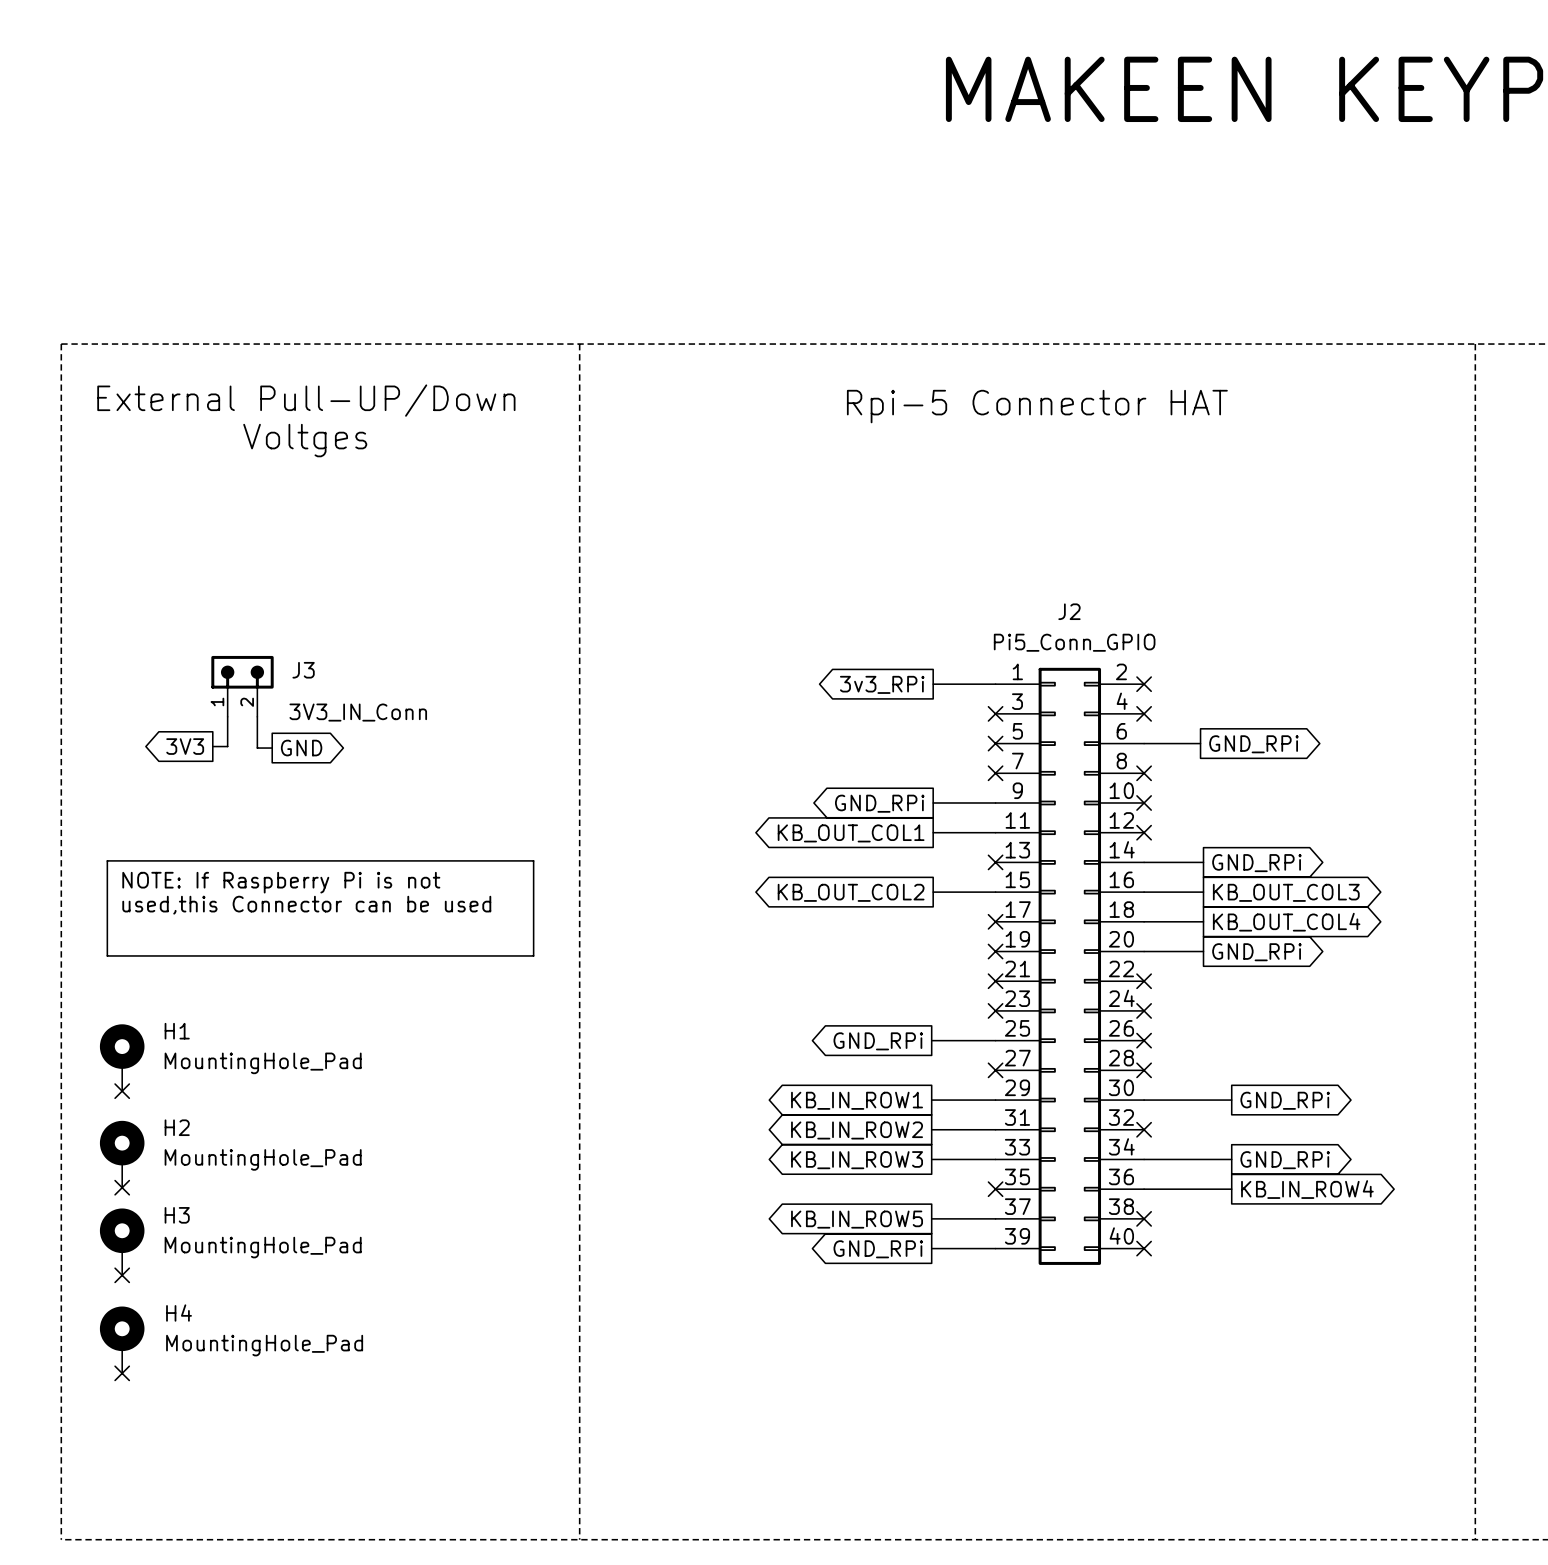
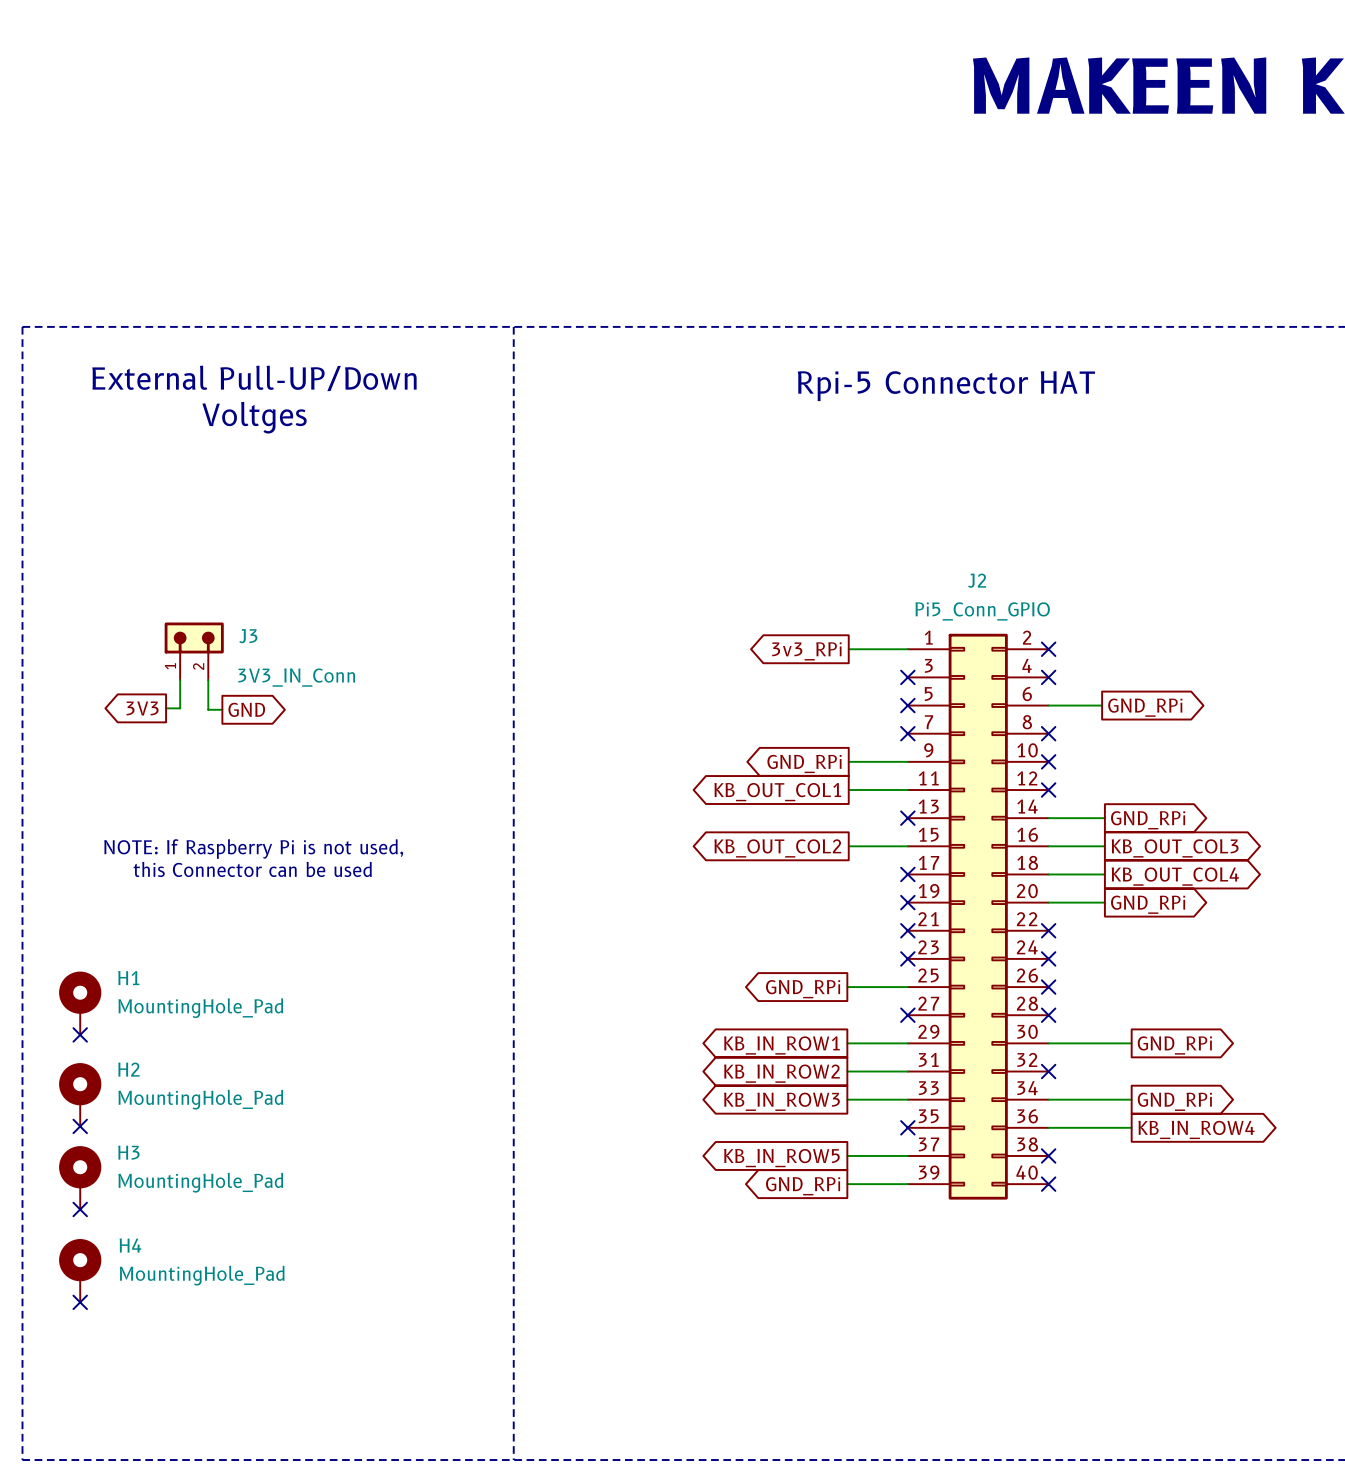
line: (107, 860) (533, 860) (533, 955) (107, 955) (107, 860) -> none
text: NOTE: If Raspberry Pi is not (281, 882) -> NOTE: If Raspberry Pi is not used, (253, 849)
text: used,this Connector can be used (306, 905) -> this Connector can be used (252, 869)

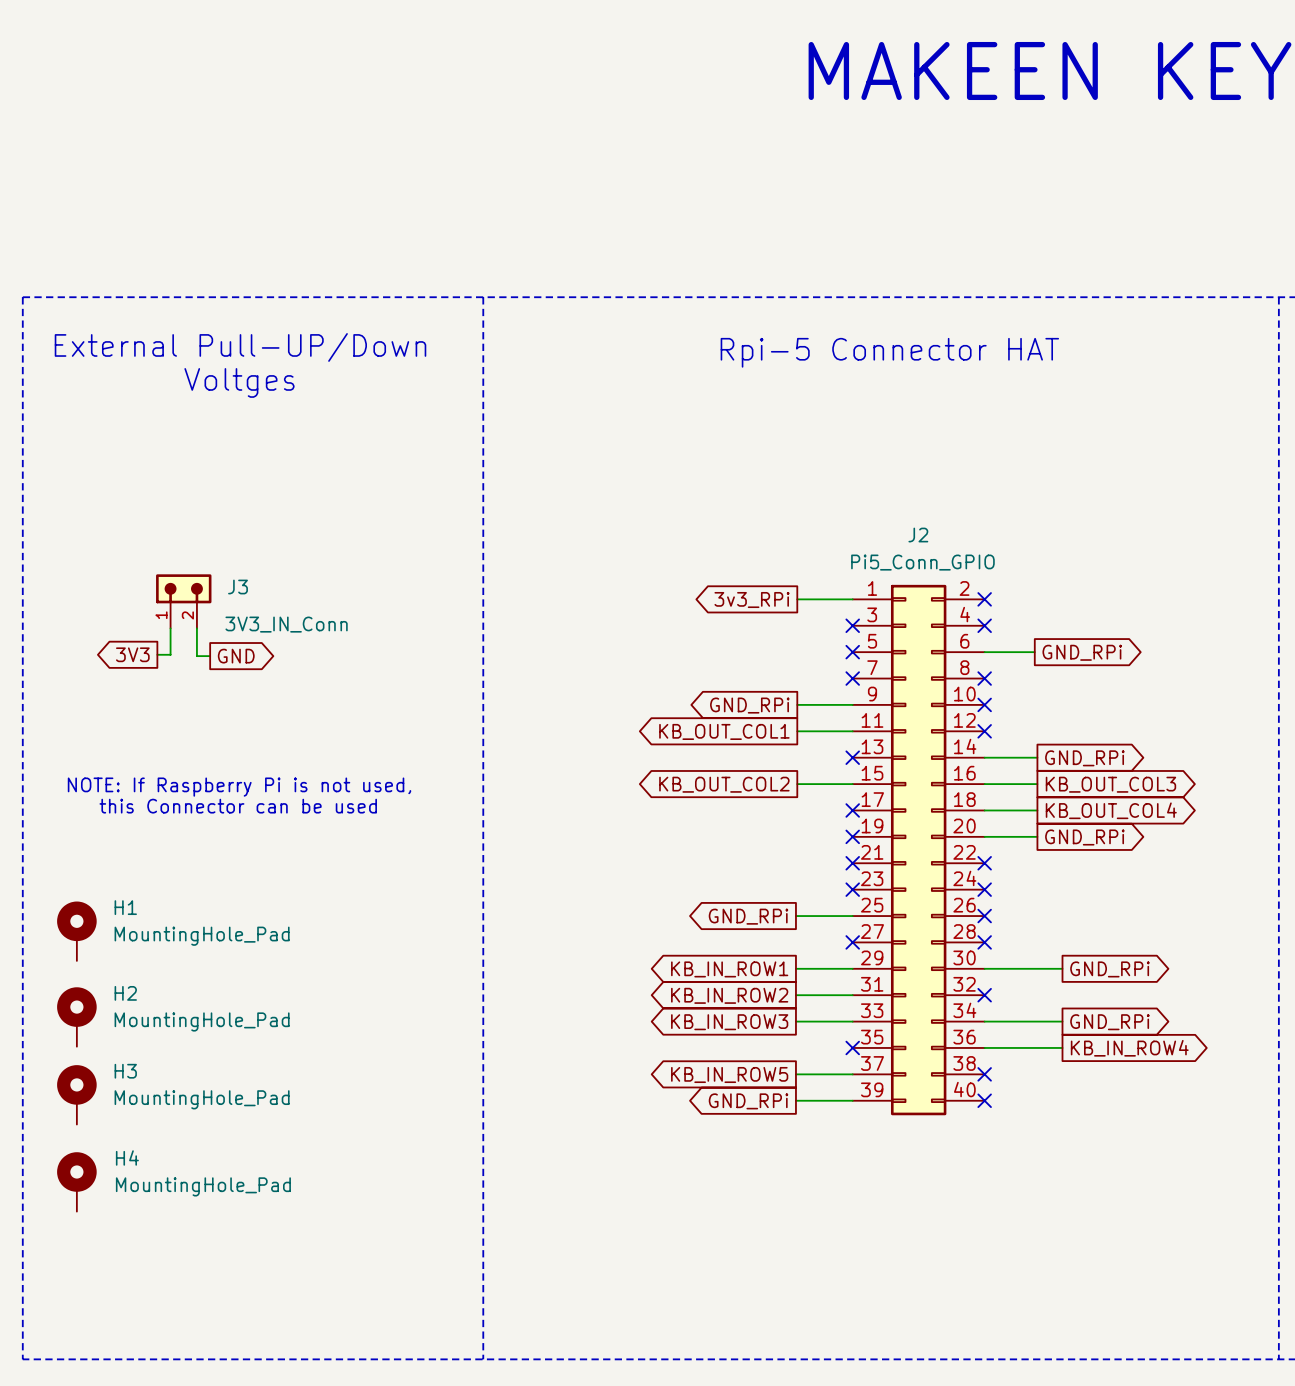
no-connect mark: (80, 1034) -> none
no-connect mark: (80, 1126) -> none
no-connect mark: (80, 1209) -> none
no-connect mark: (80, 1302) -> none

